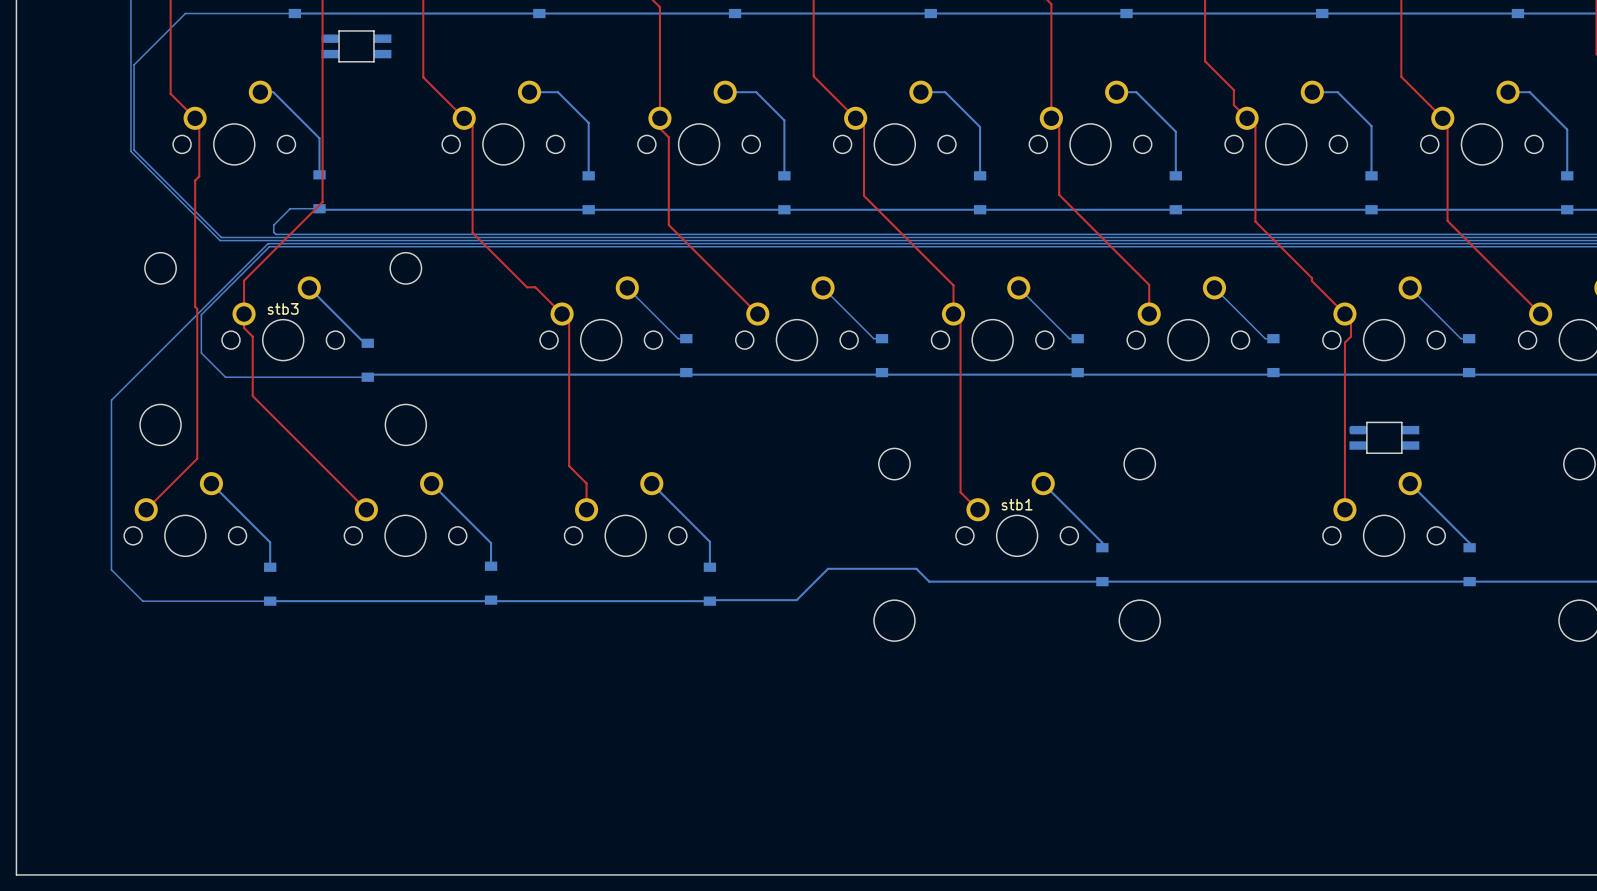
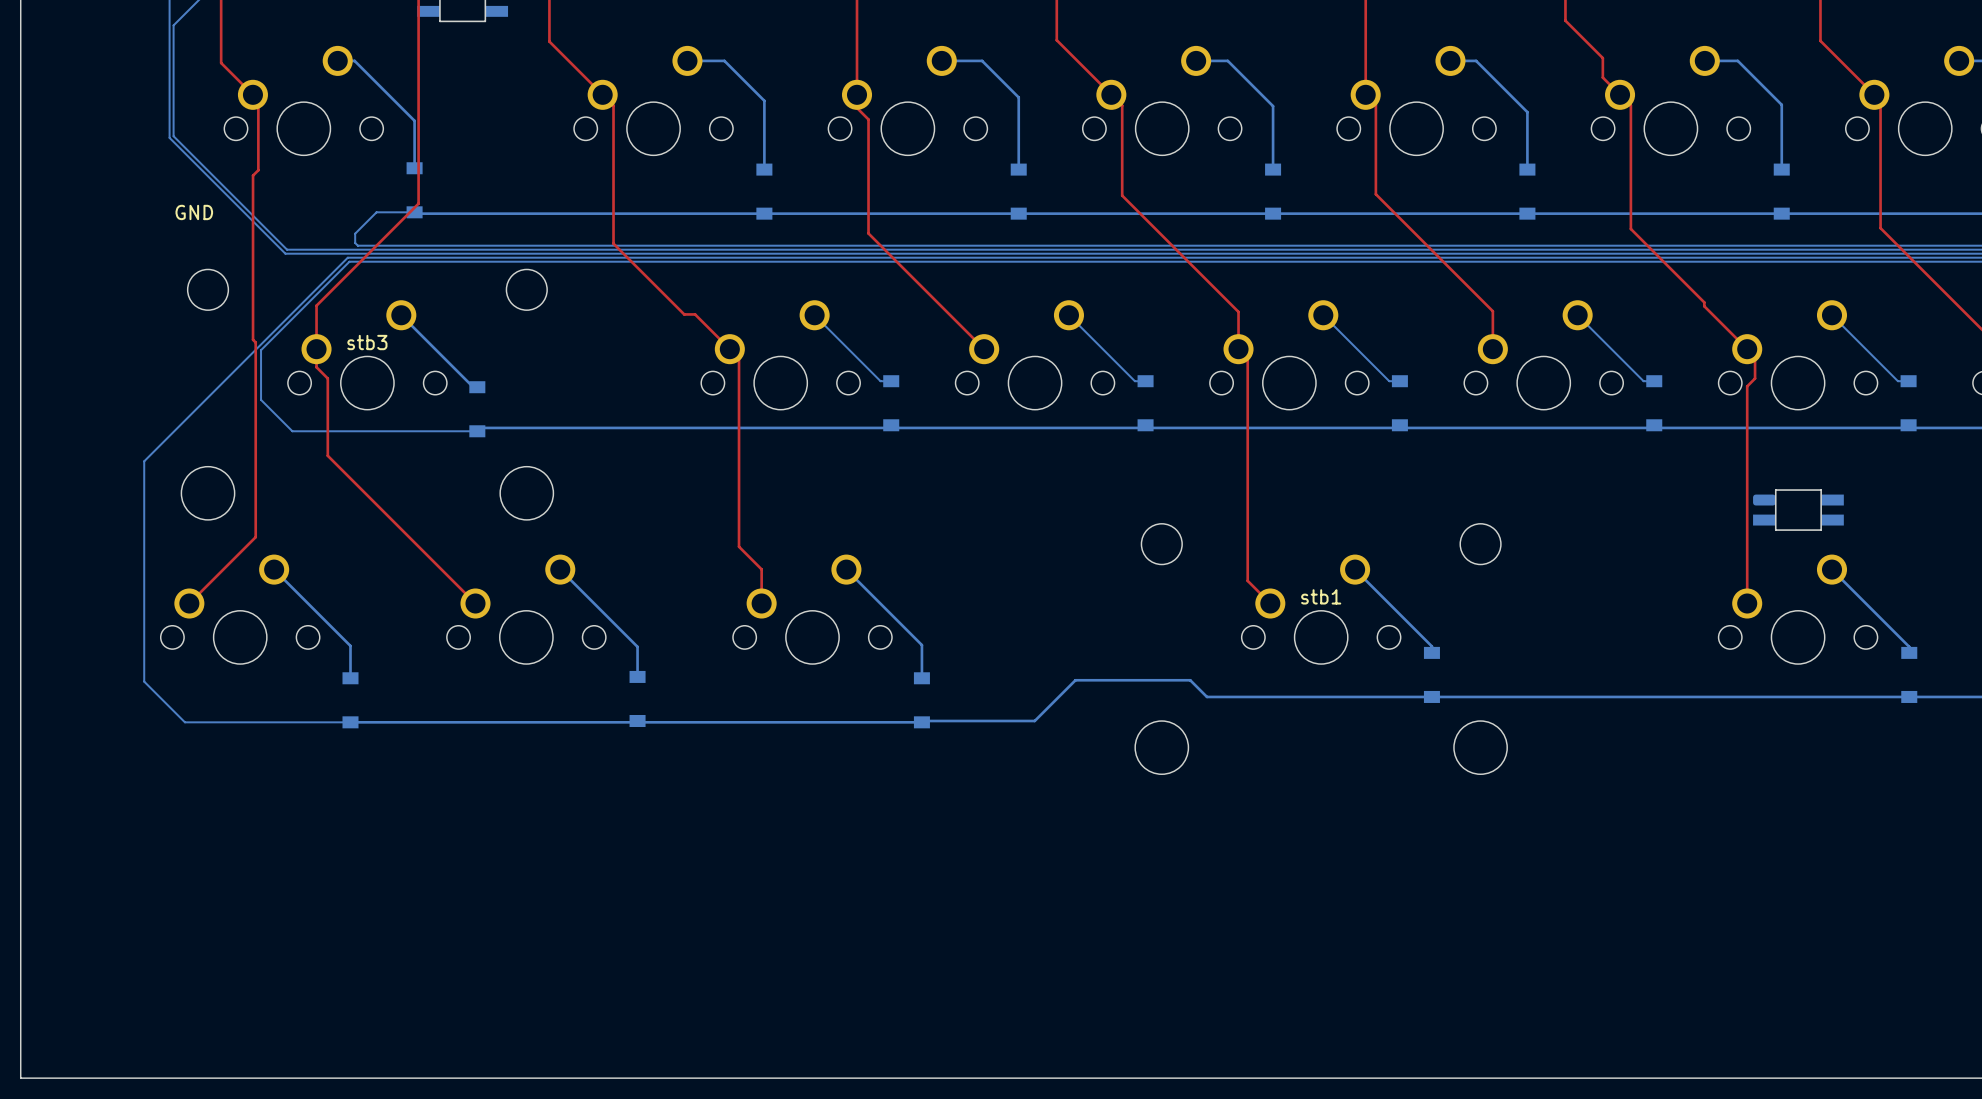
text: none -> GND (194, 212)

